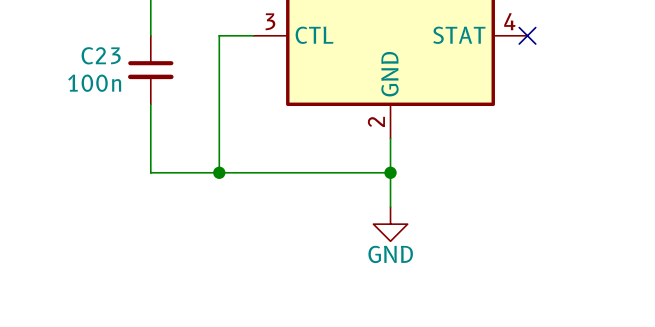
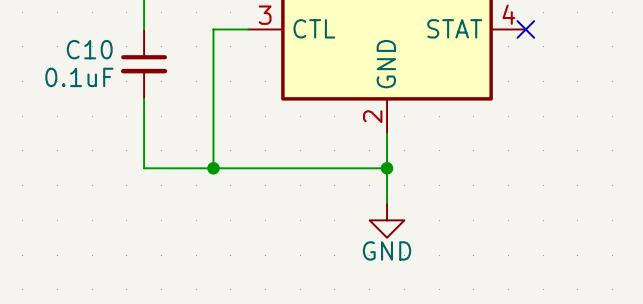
C23 name: C23 (101, 55) -> C10 (89, 49)
C23 value: 100n (94, 83) -> 0.1uF (79, 77)

